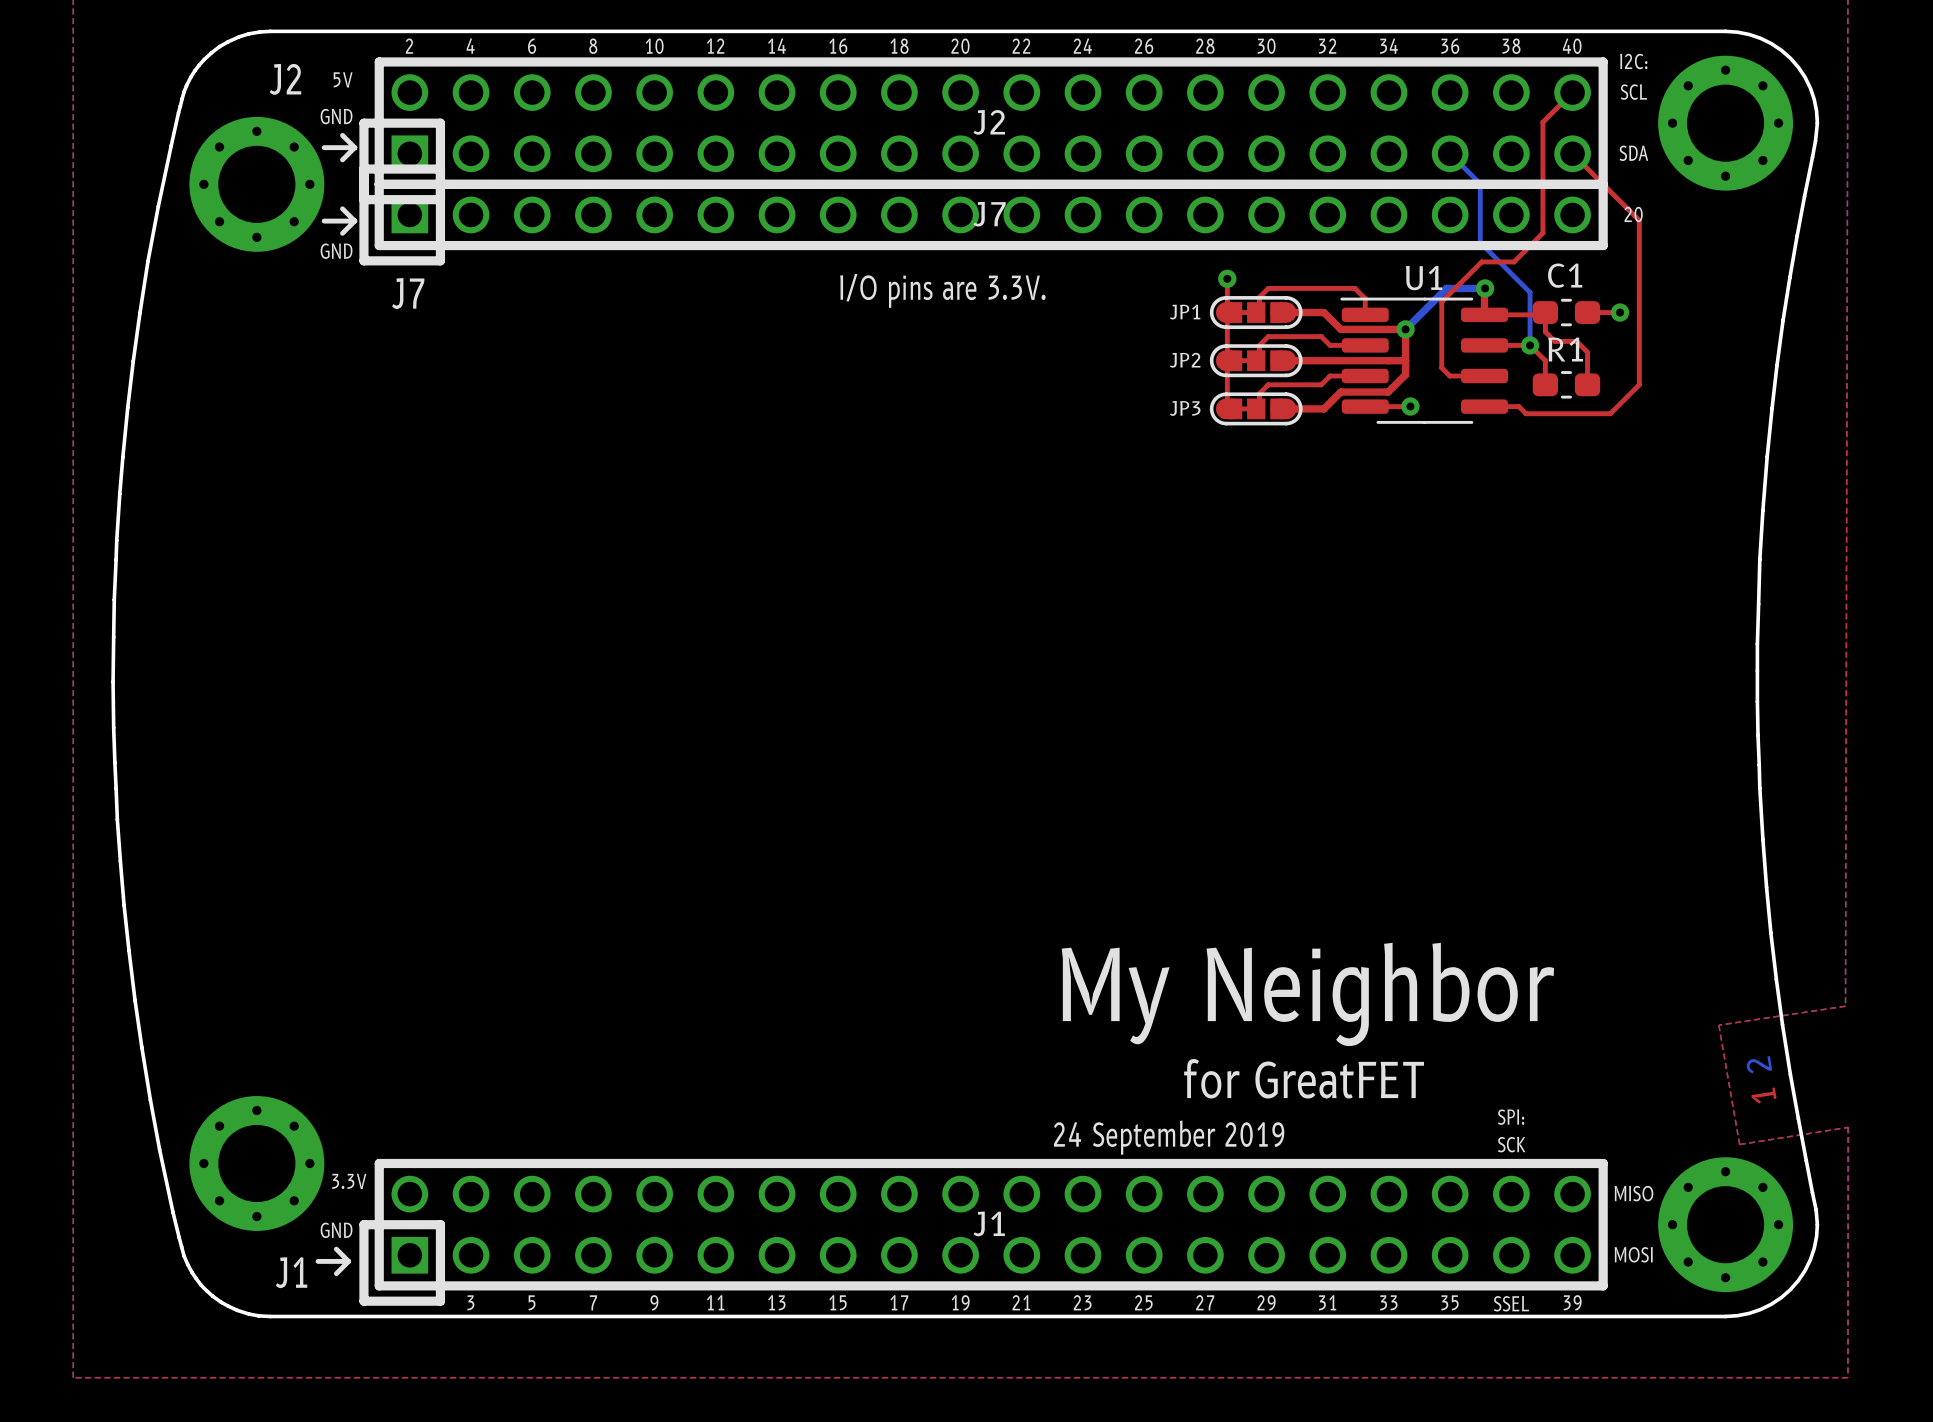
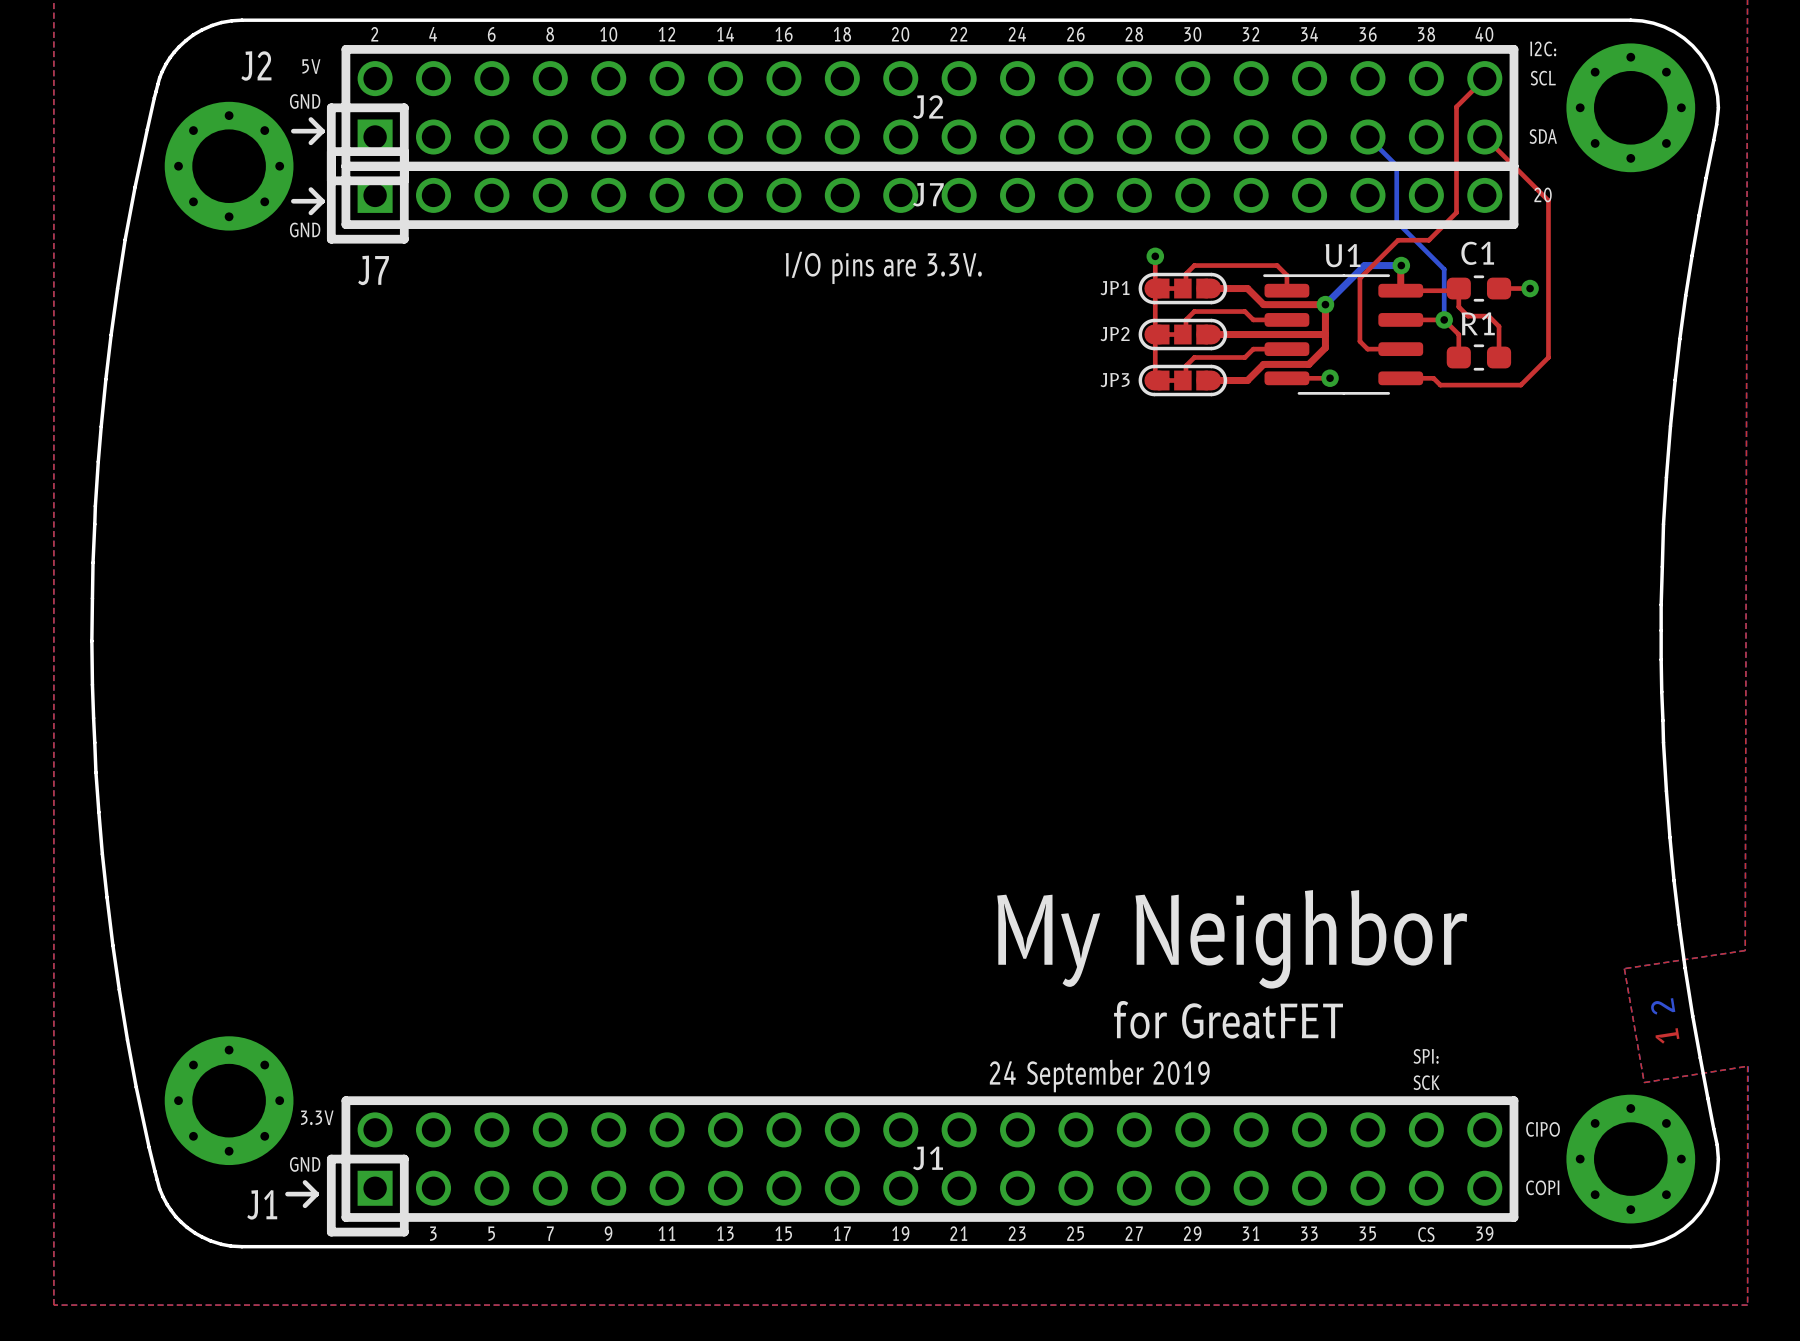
text: MISO (1633, 1193) -> CIPO (1543, 1129)
text: MOSI (1633, 1254) -> COPI (1542, 1187)
text: SSEL (1511, 1303) -> CS (1426, 1234)

